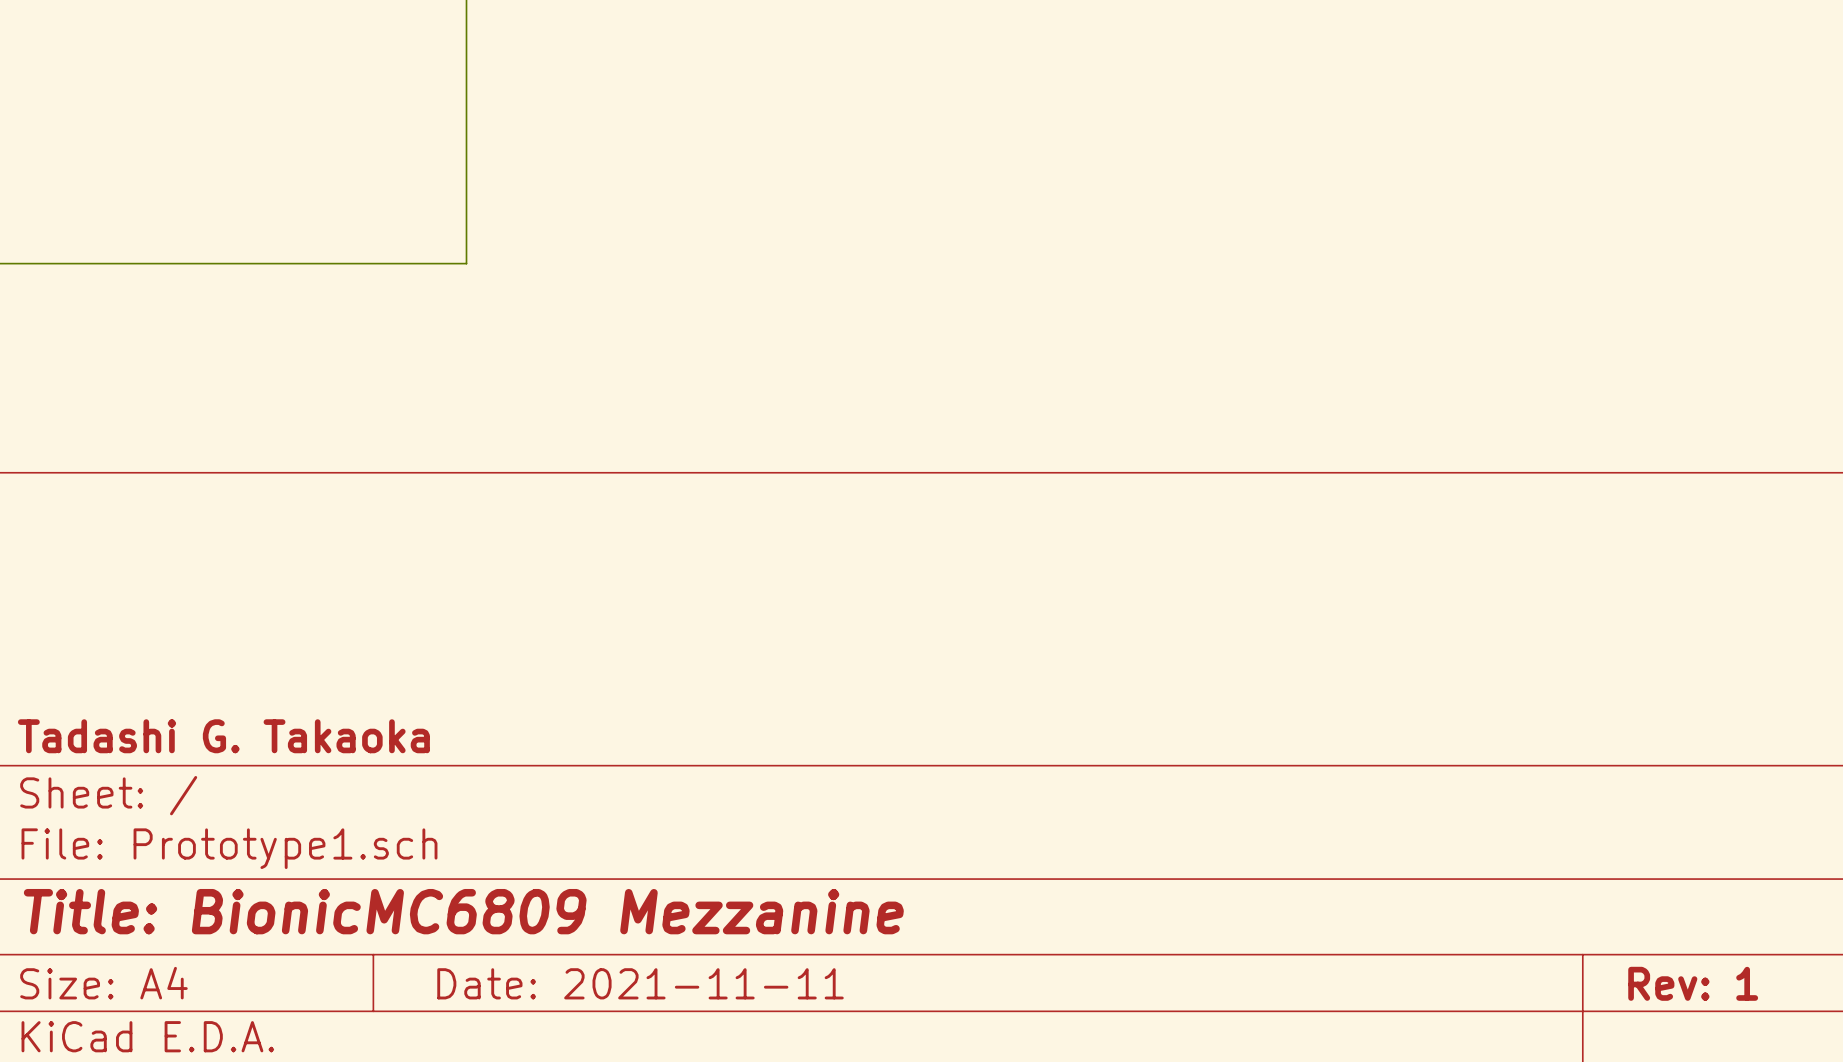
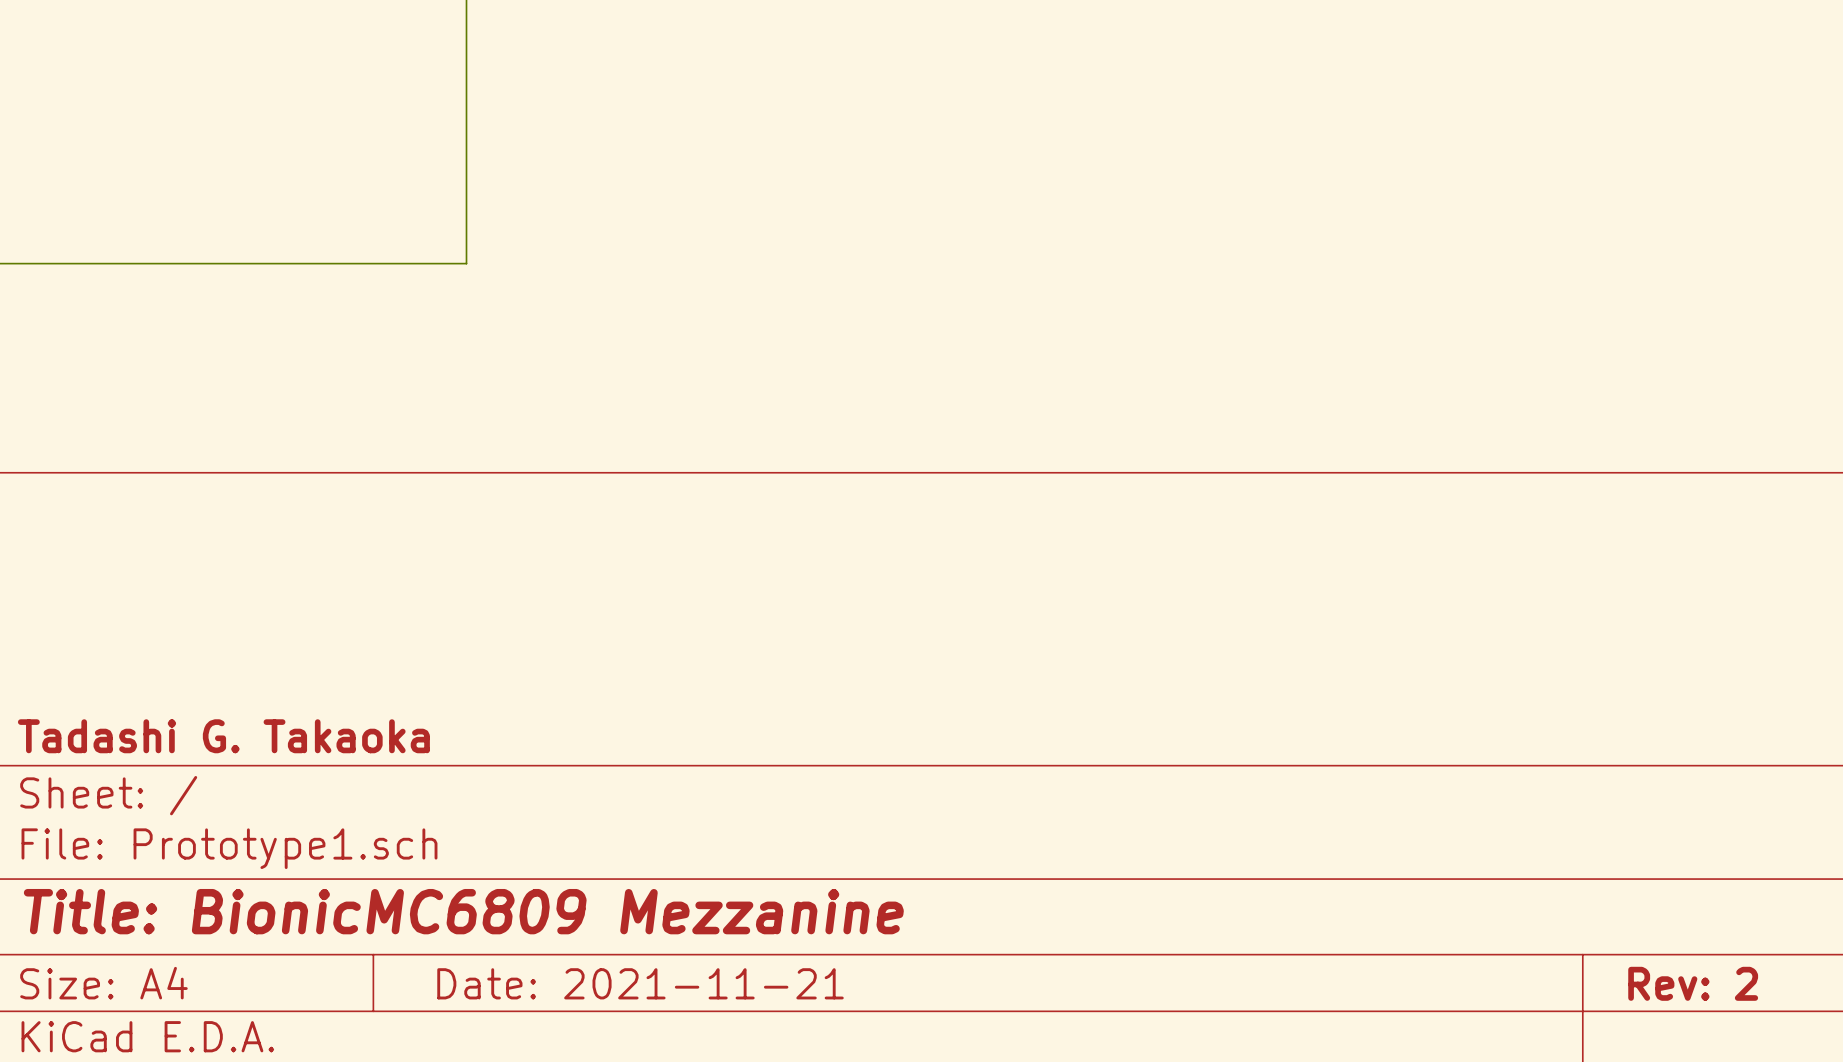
title block: Date: 2021-11-11 (640, 983) -> Date: 2021-11-21 (640, 983)
title block: Rev: 1 (1693, 983) -> Rev: 2 (1693, 983)

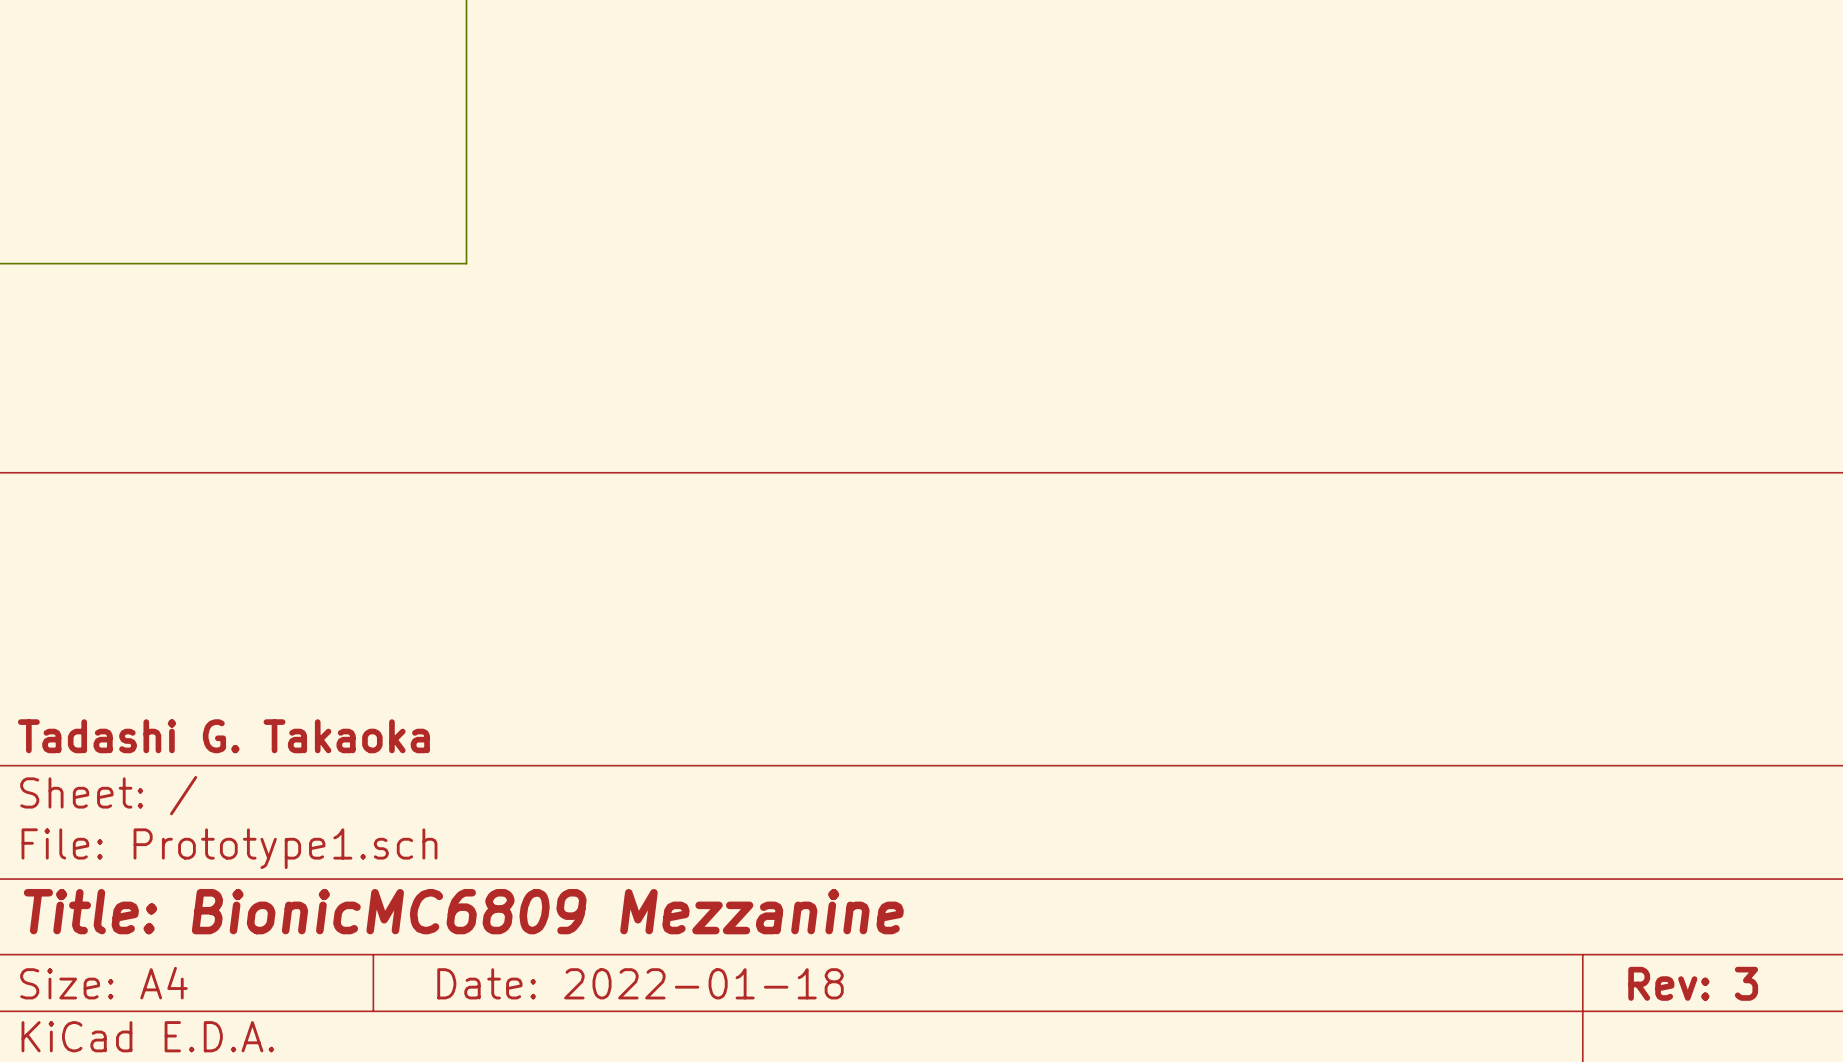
title block: Date: 2021-11-21 (640, 983) -> Date: 2022-01-18 (640, 983)
title block: Rev: 2 (1693, 983) -> Rev: 3 (1693, 983)

